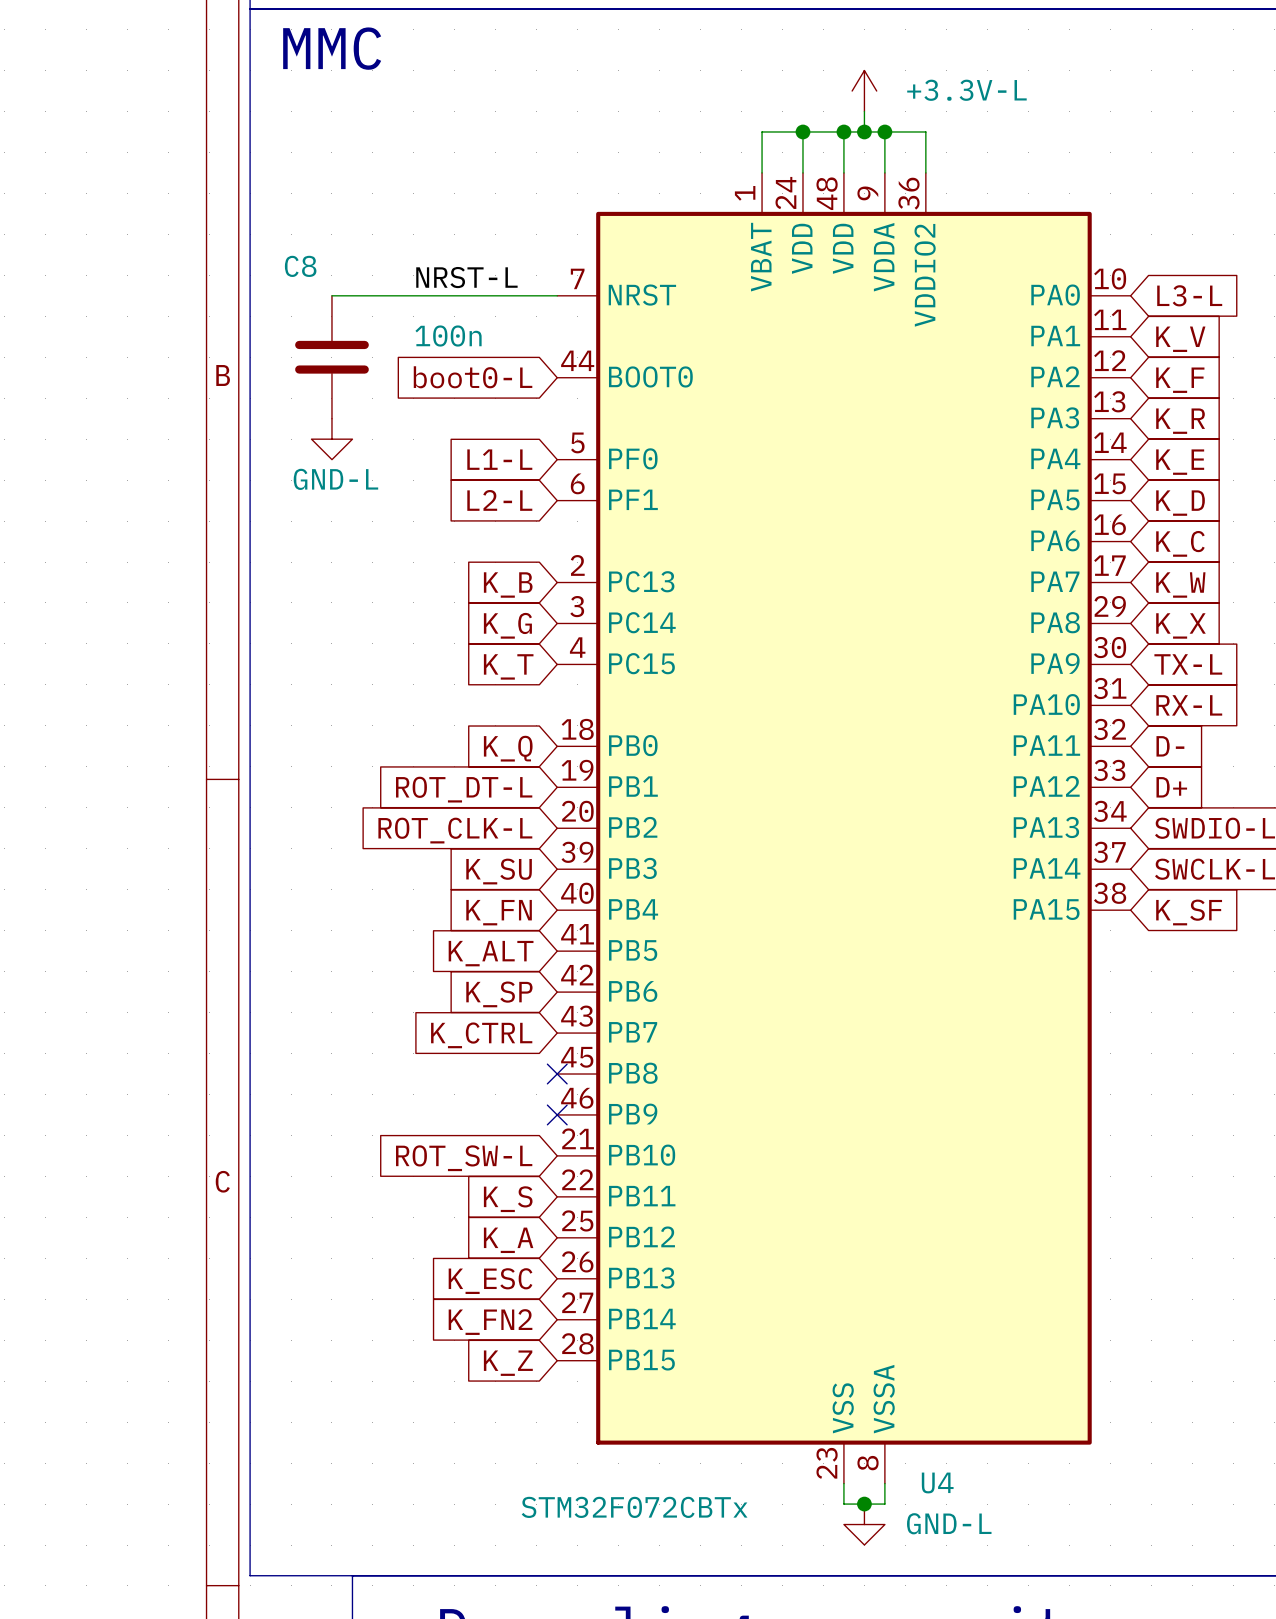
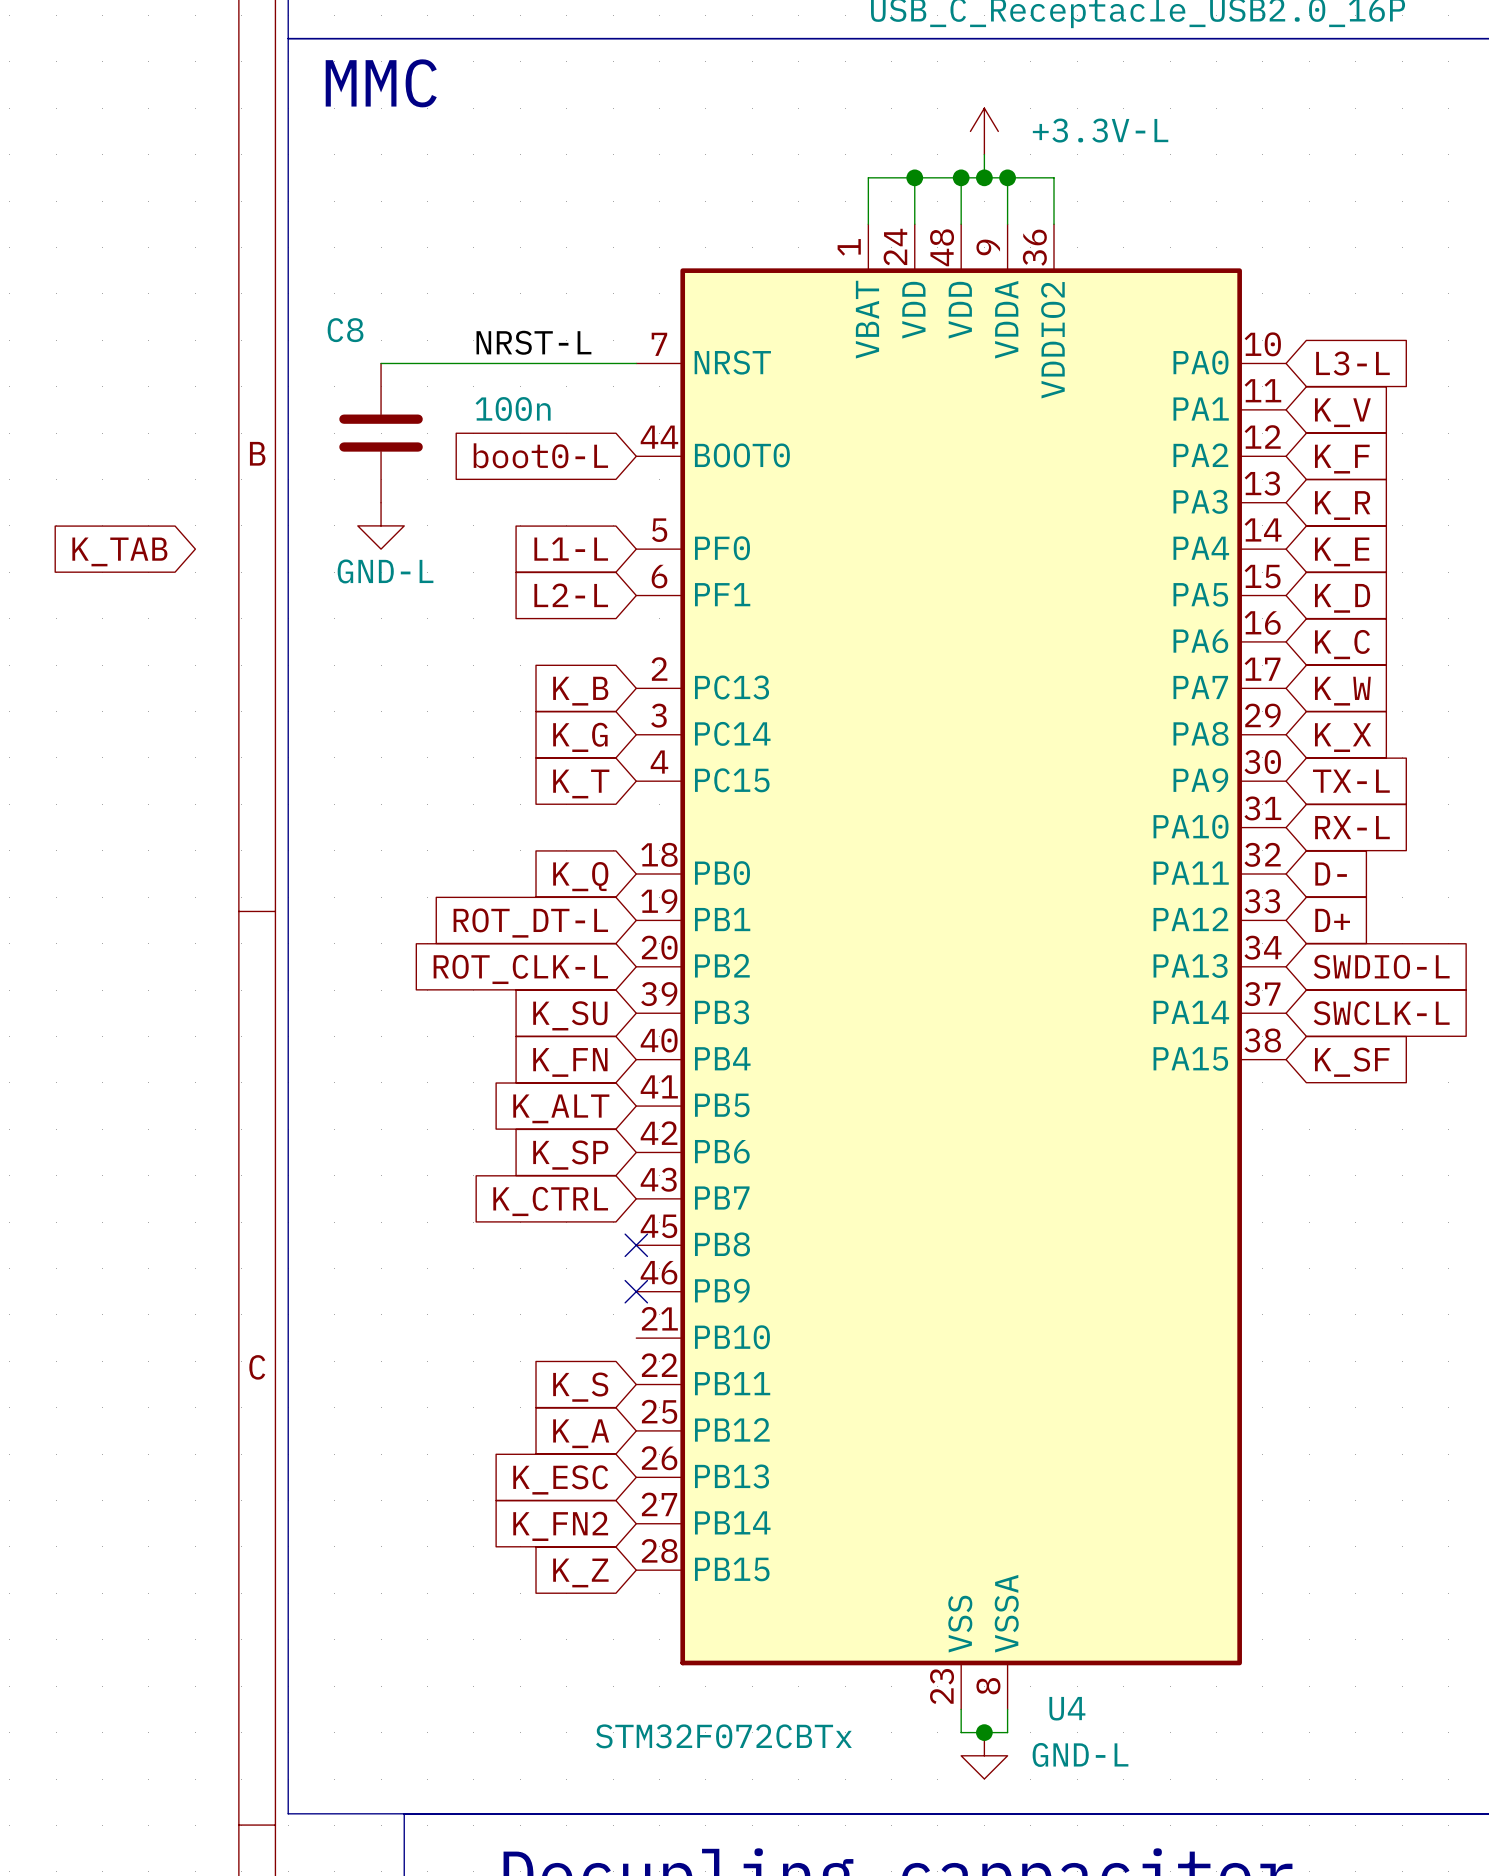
global label: none -> K_TAB (119, 551)
global label: ROT_SW-L (464, 1158) -> none

